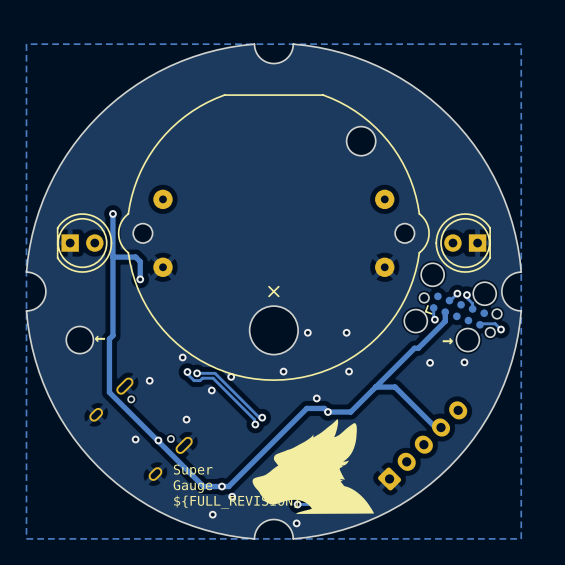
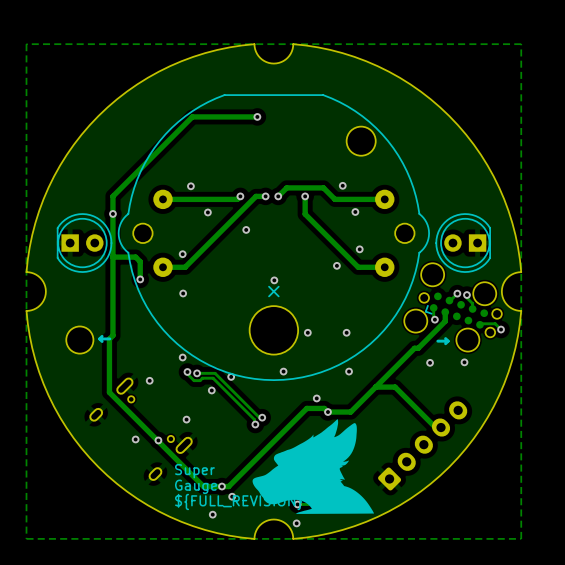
track: none -> (257, 116) (192, 116) (112, 196) (112, 213)
via: none -> (257, 116)
via: none -> (342, 185)
via: none -> (190, 186)
track: none -> (240, 196) (237, 199) (162, 199)
via: none -> (240, 196)
track: none -> (265, 196) (256, 196) (185, 267) (162, 267)
via: none -> (265, 196)
track: none -> (278, 196) (286, 187) (323, 187) (334, 199) (384, 199)
via: none -> (278, 196)
track: none -> (305, 196) (305, 214) (358, 267) (384, 267)
via: none -> (305, 196)
via: none -> (355, 211)
via: none -> (207, 212)
via: none -> (246, 229)
via: none -> (359, 249)
via: none -> (182, 254)
via: none -> (336, 265)
via: none -> (274, 280)
via: none -> (183, 293)

